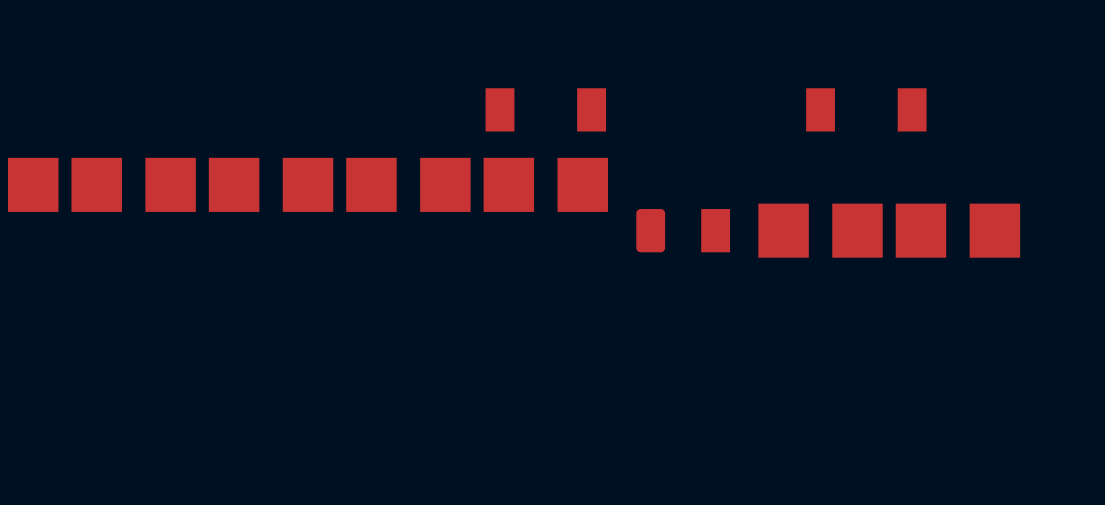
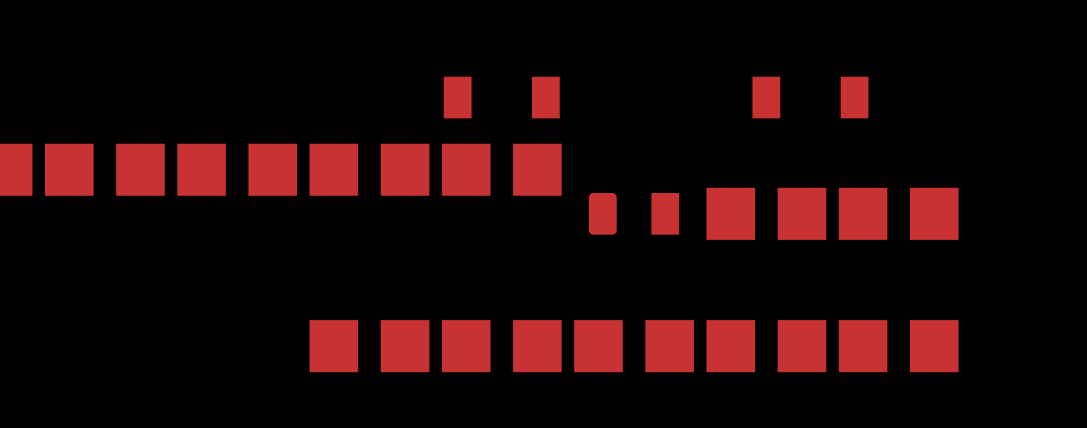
part: none -> (369, 346)
part: none -> (501, 346)
part: none -> (634, 346)
part: none -> (766, 346)
part: none -> (898, 346)

